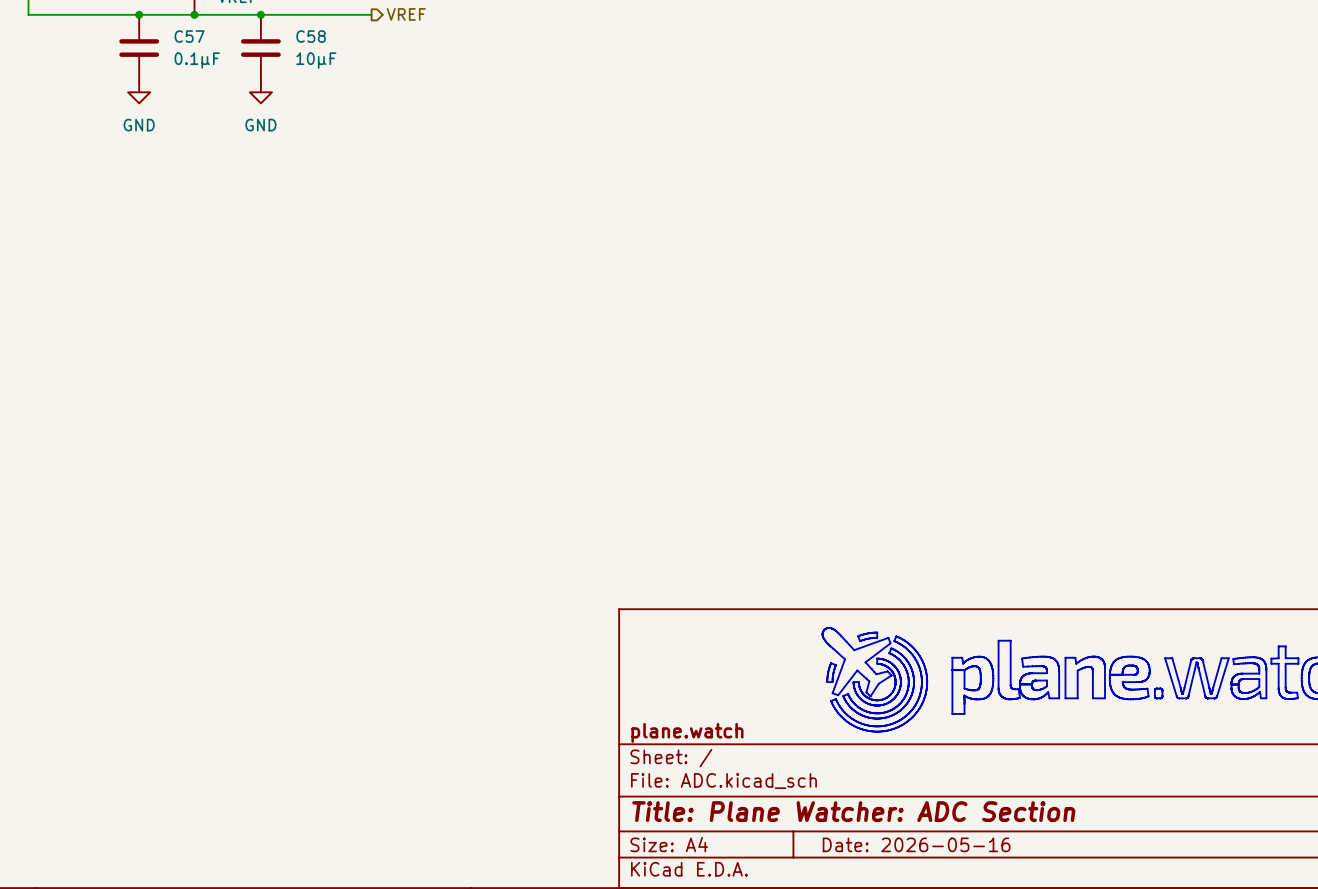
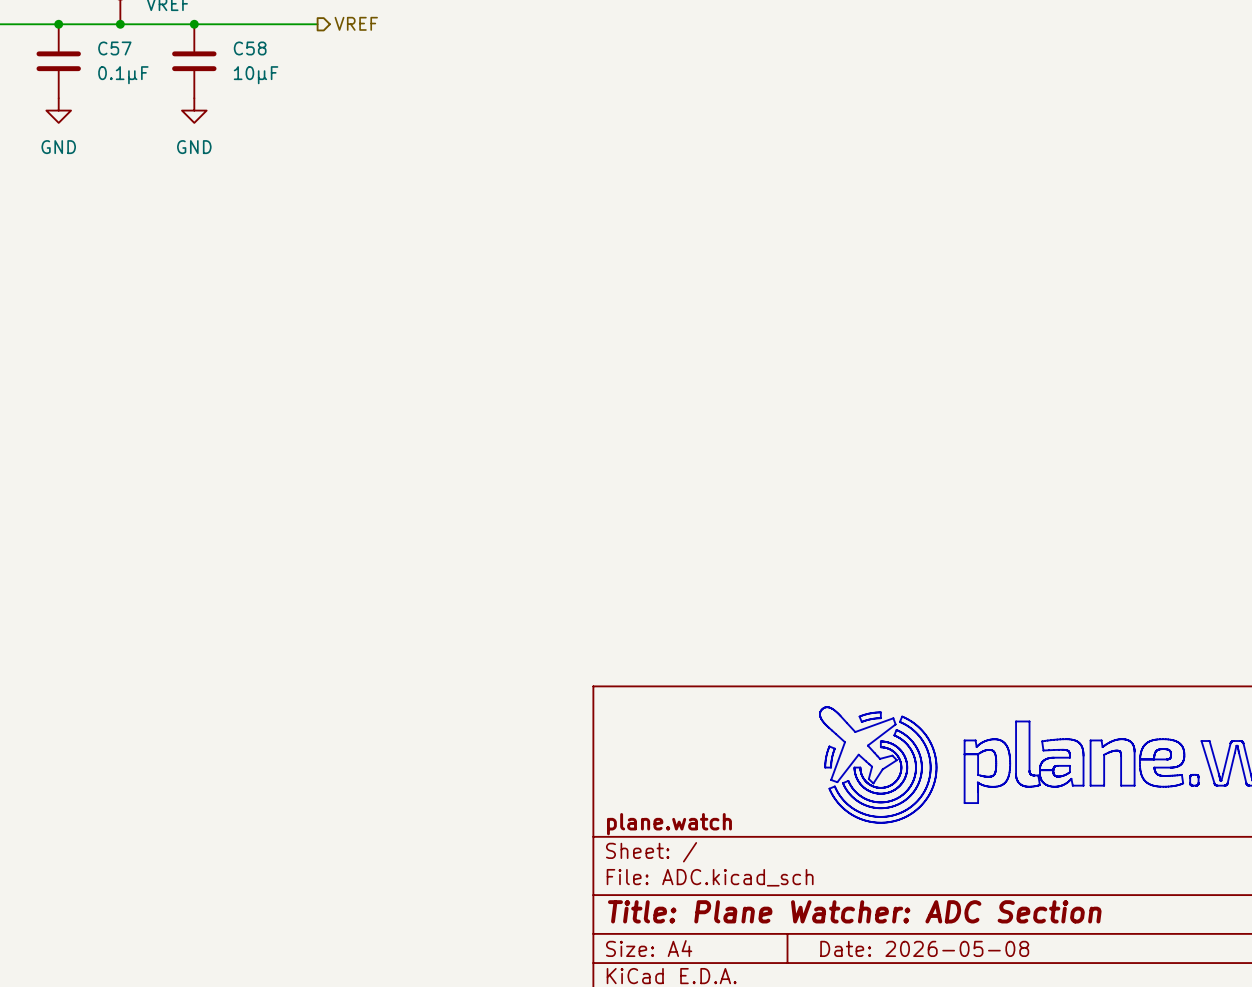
title block: Date: 2026-05-16 (916, 844) -> Date: 2026-05-08 (924, 948)

